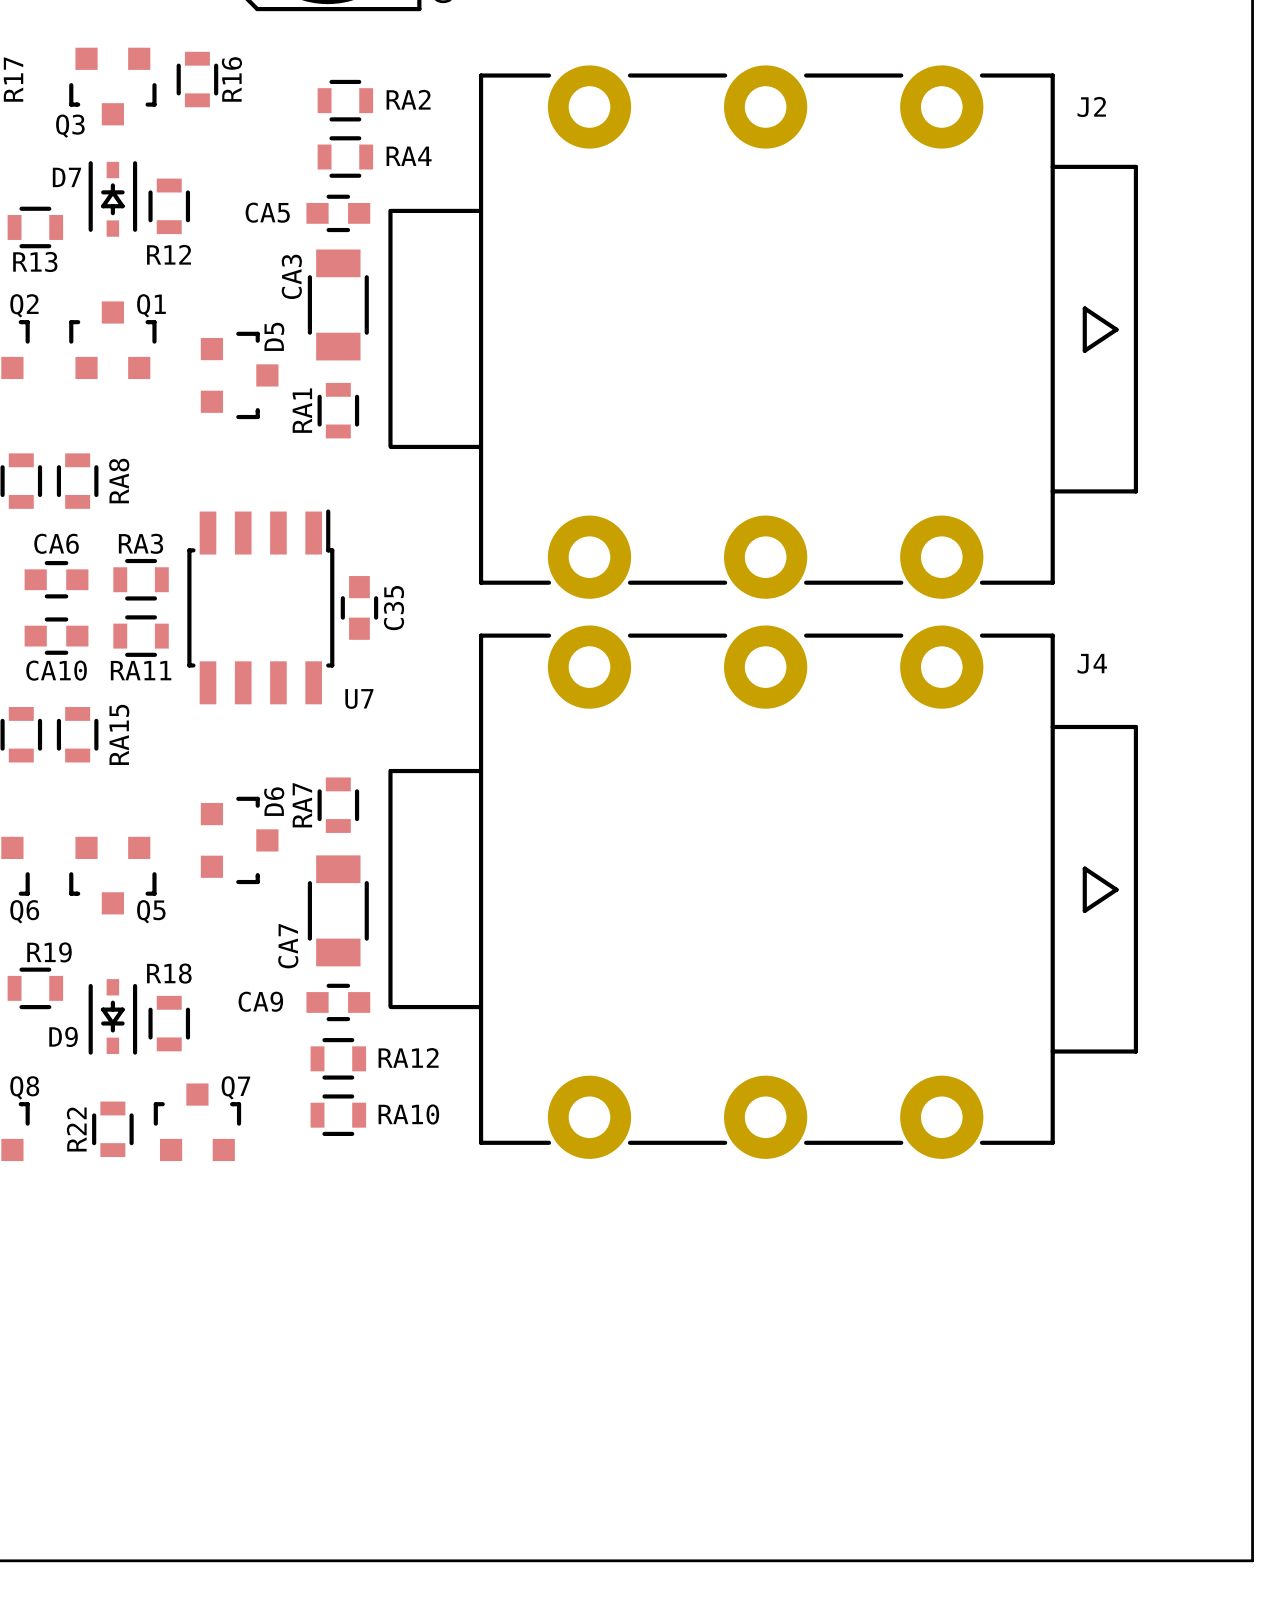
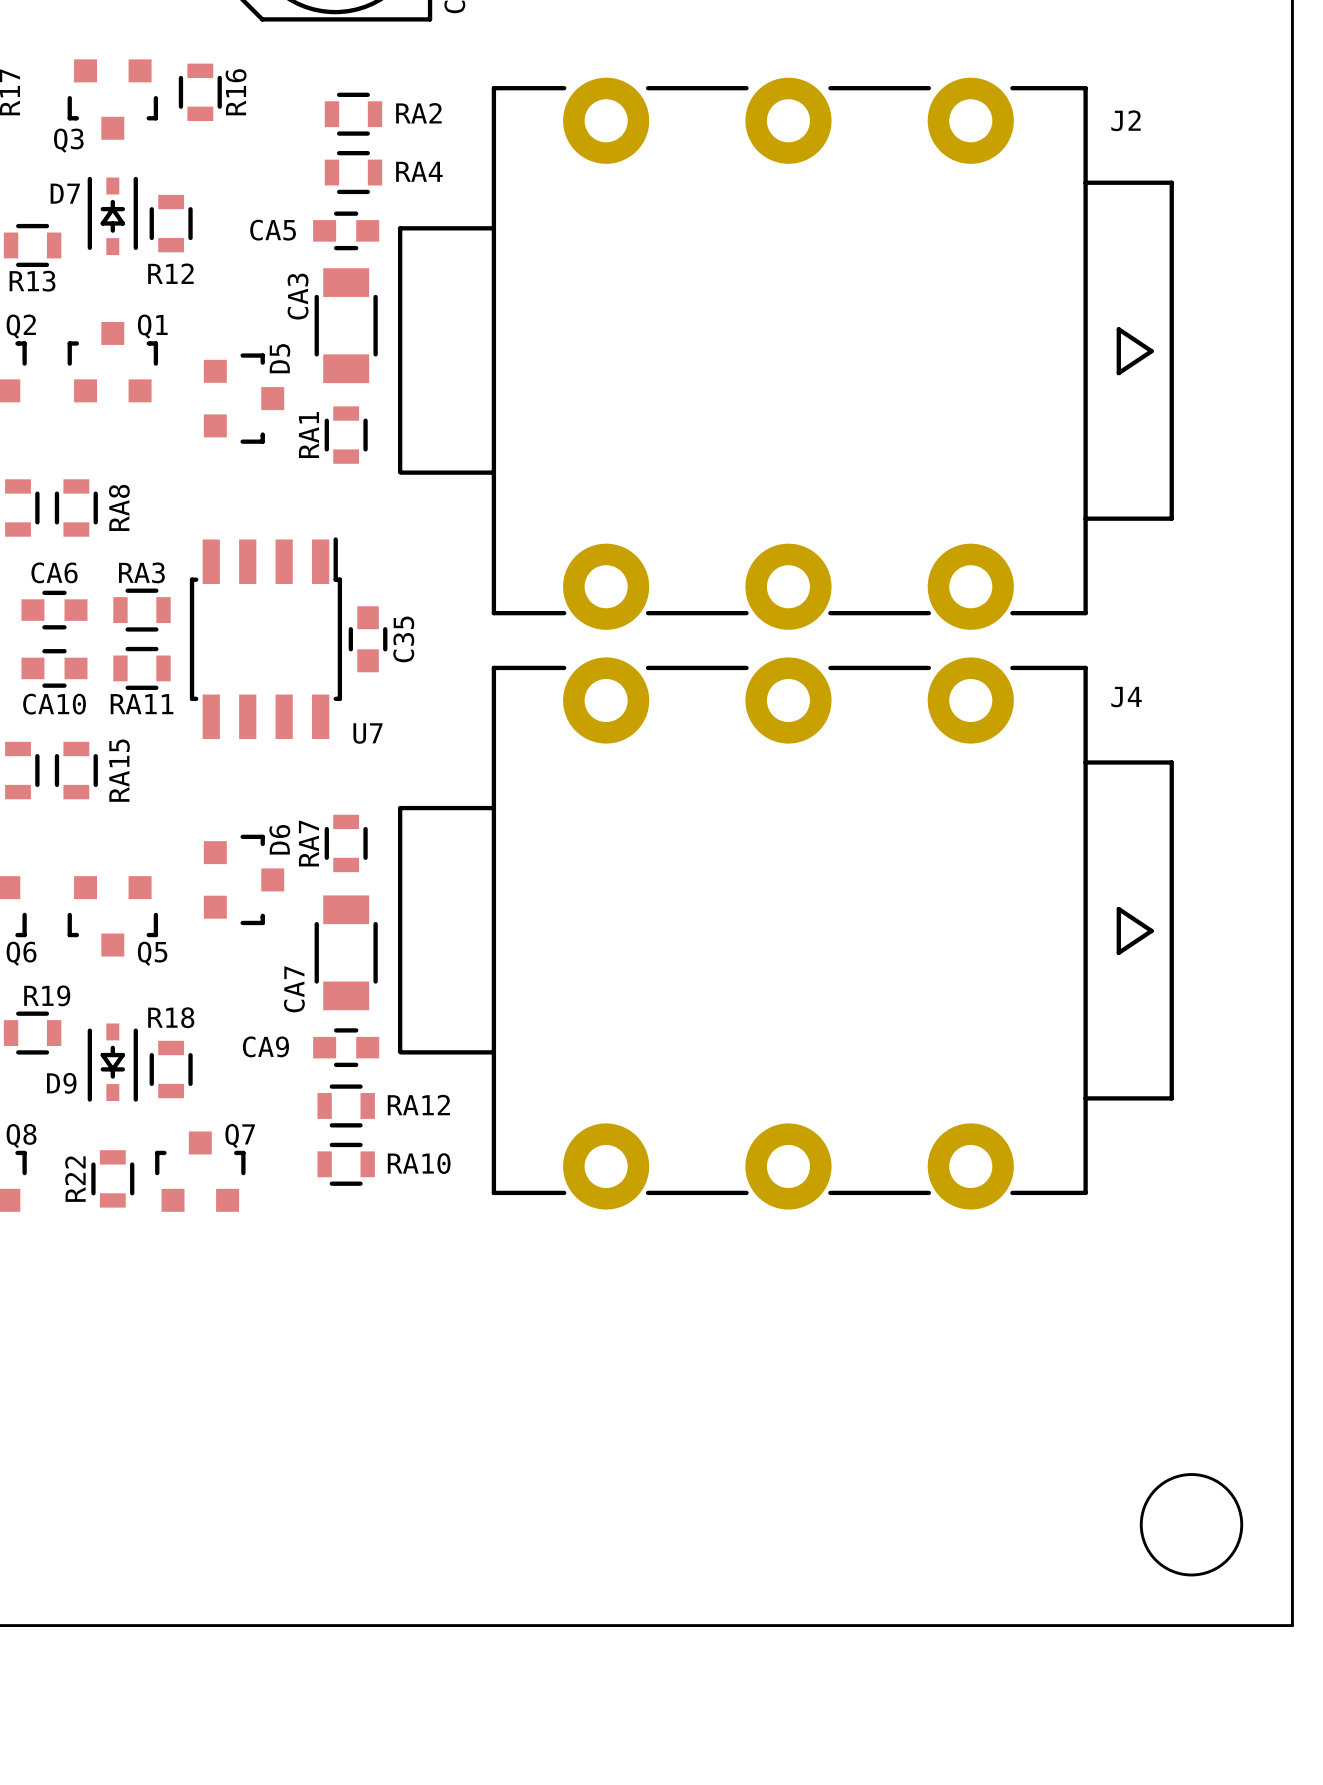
round board edge: none -> [1139, 1473, 1244, 1577]

